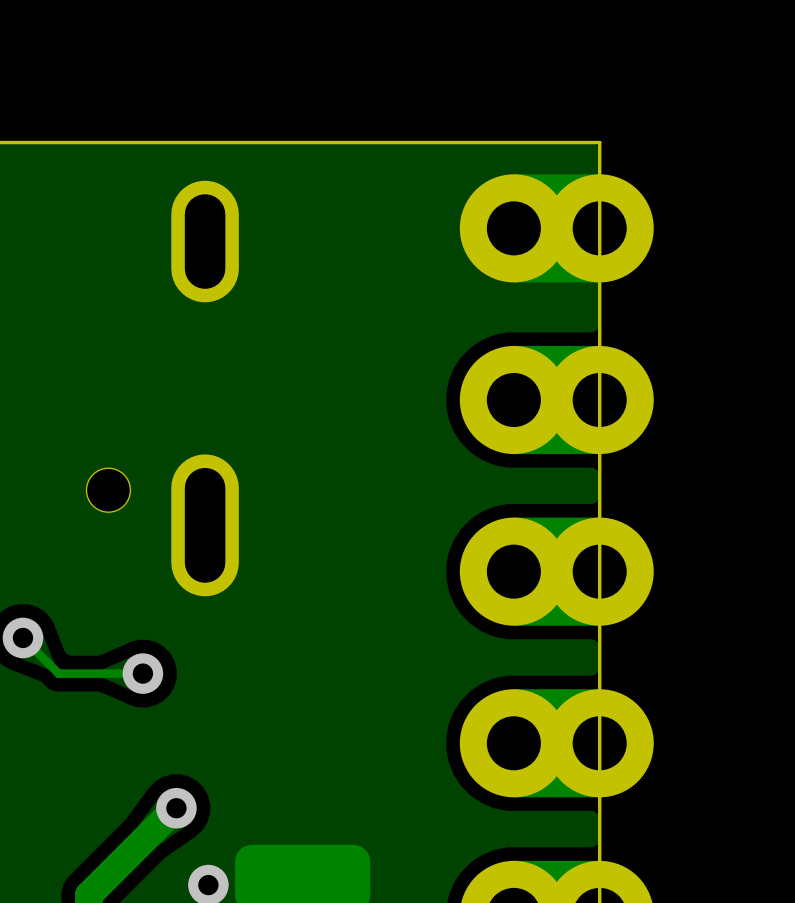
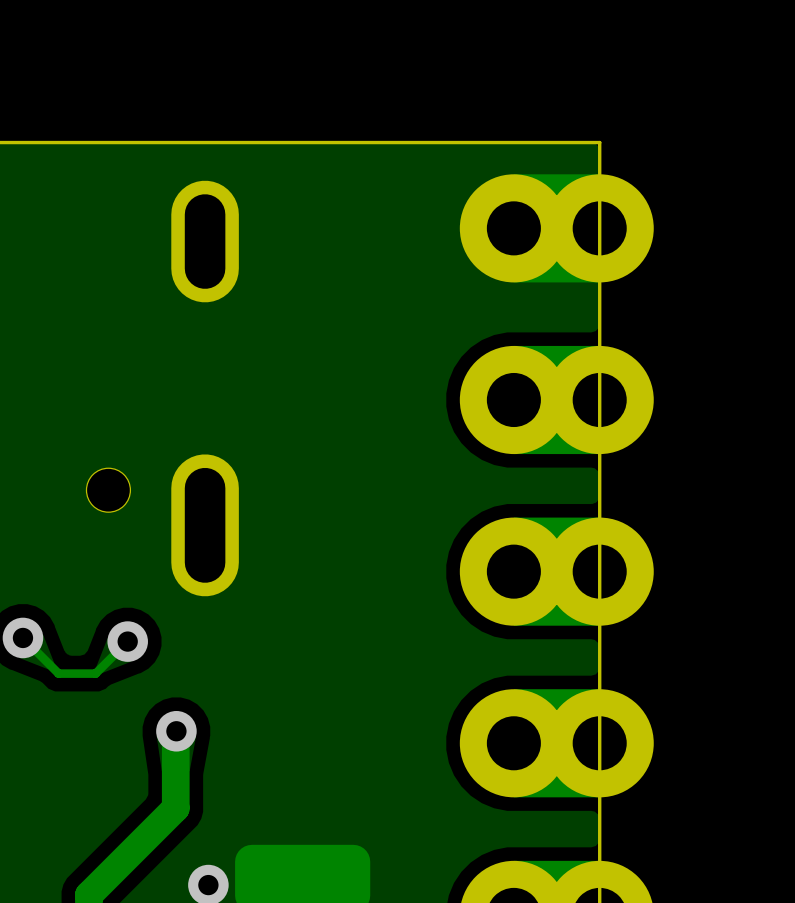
track: (142, 673) (95, 673) -> (127, 641) (95, 673)
via position: (142, 673) -> (127, 641)
track: none -> (175, 731) (175, 808)
via: none -> (176, 731)
via: (176, 808) -> none

